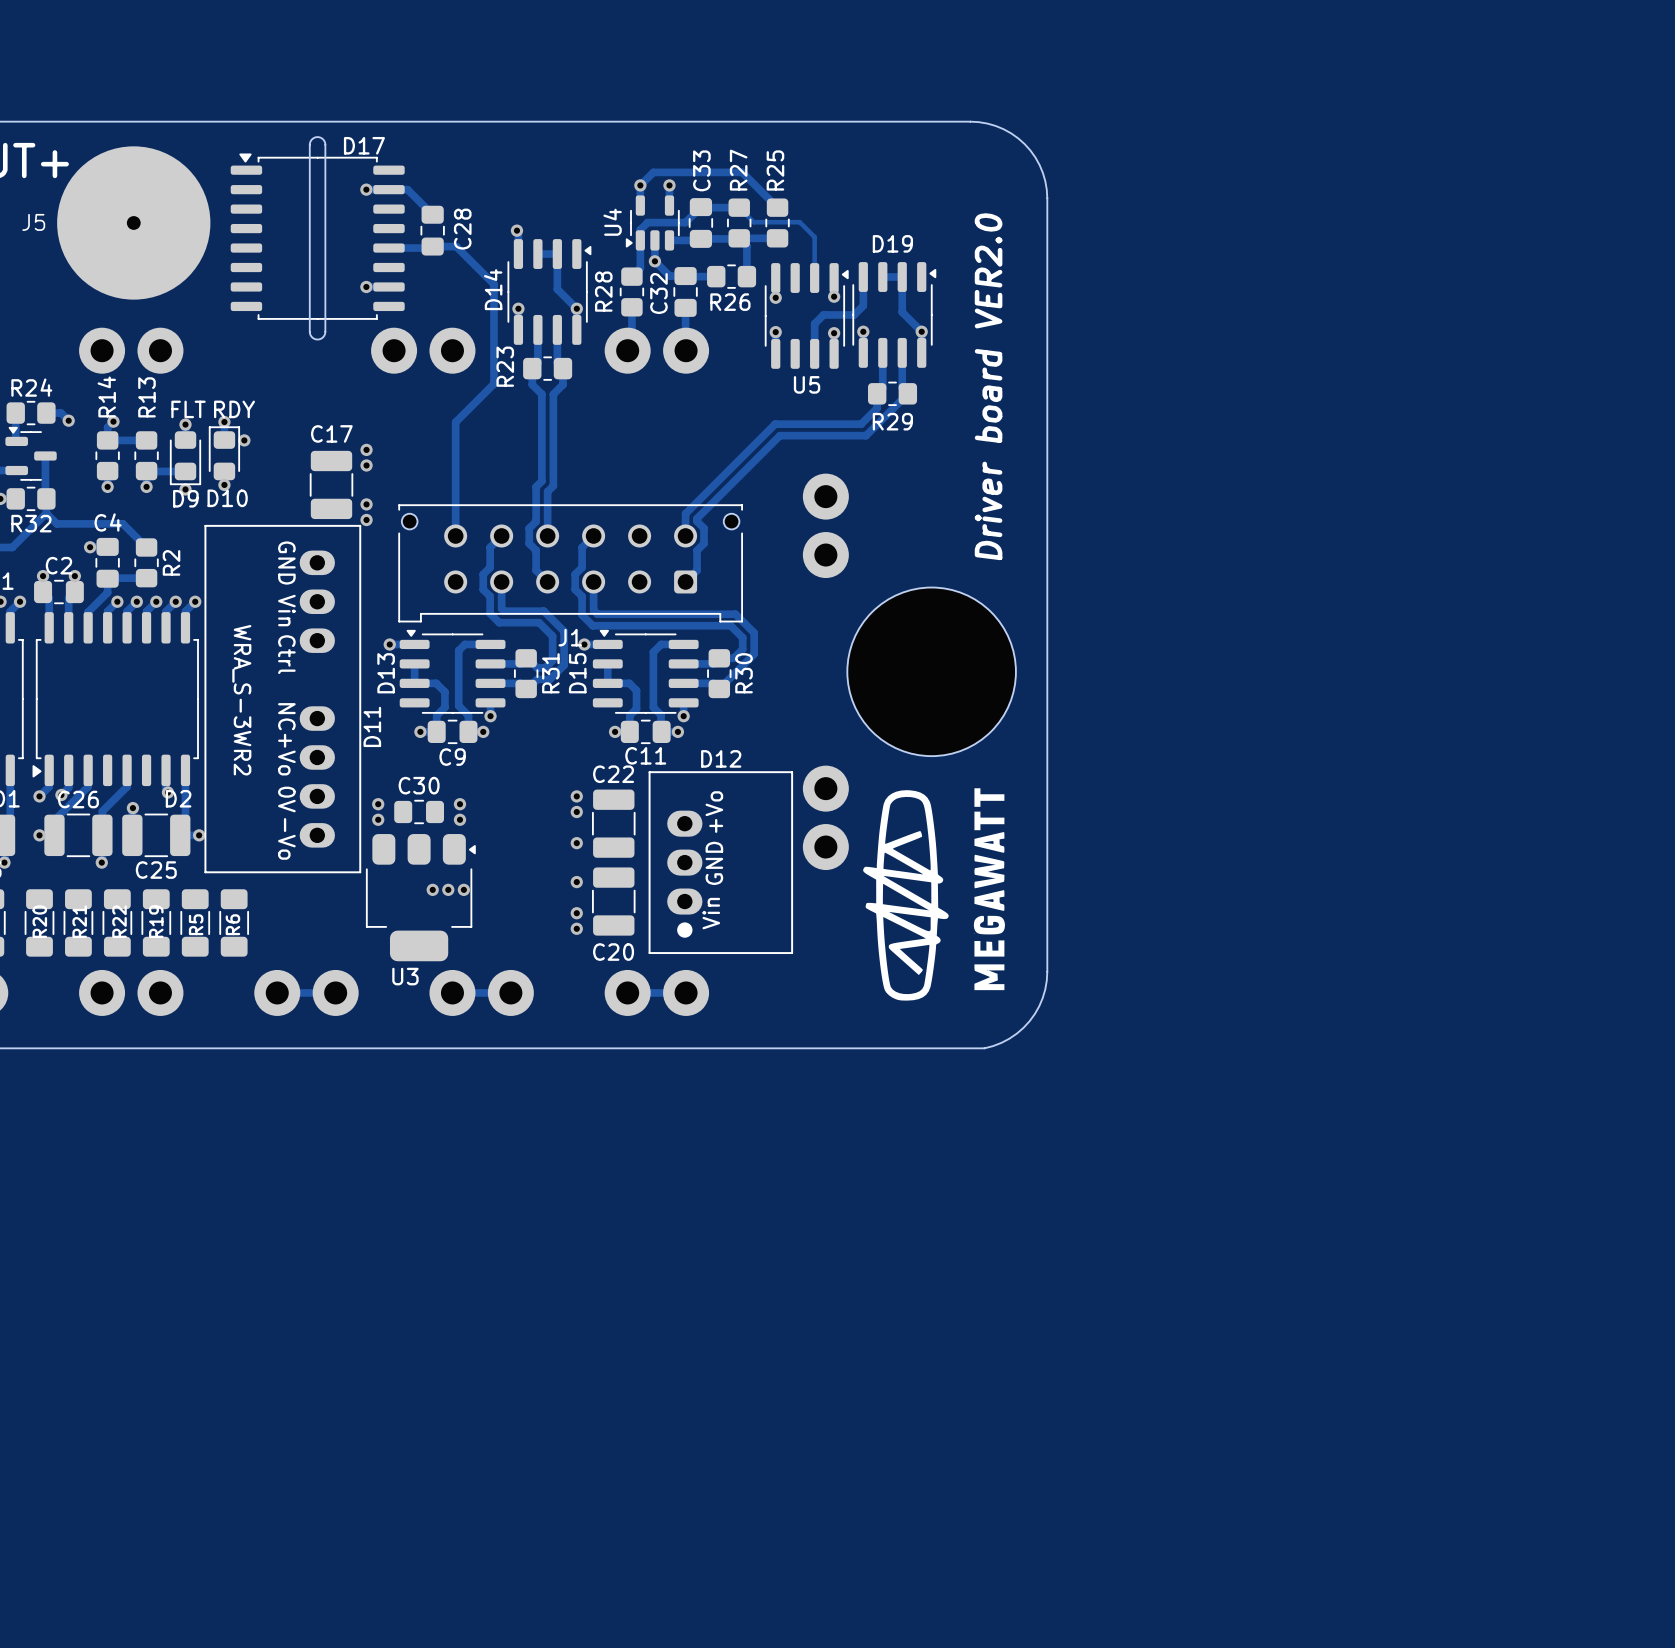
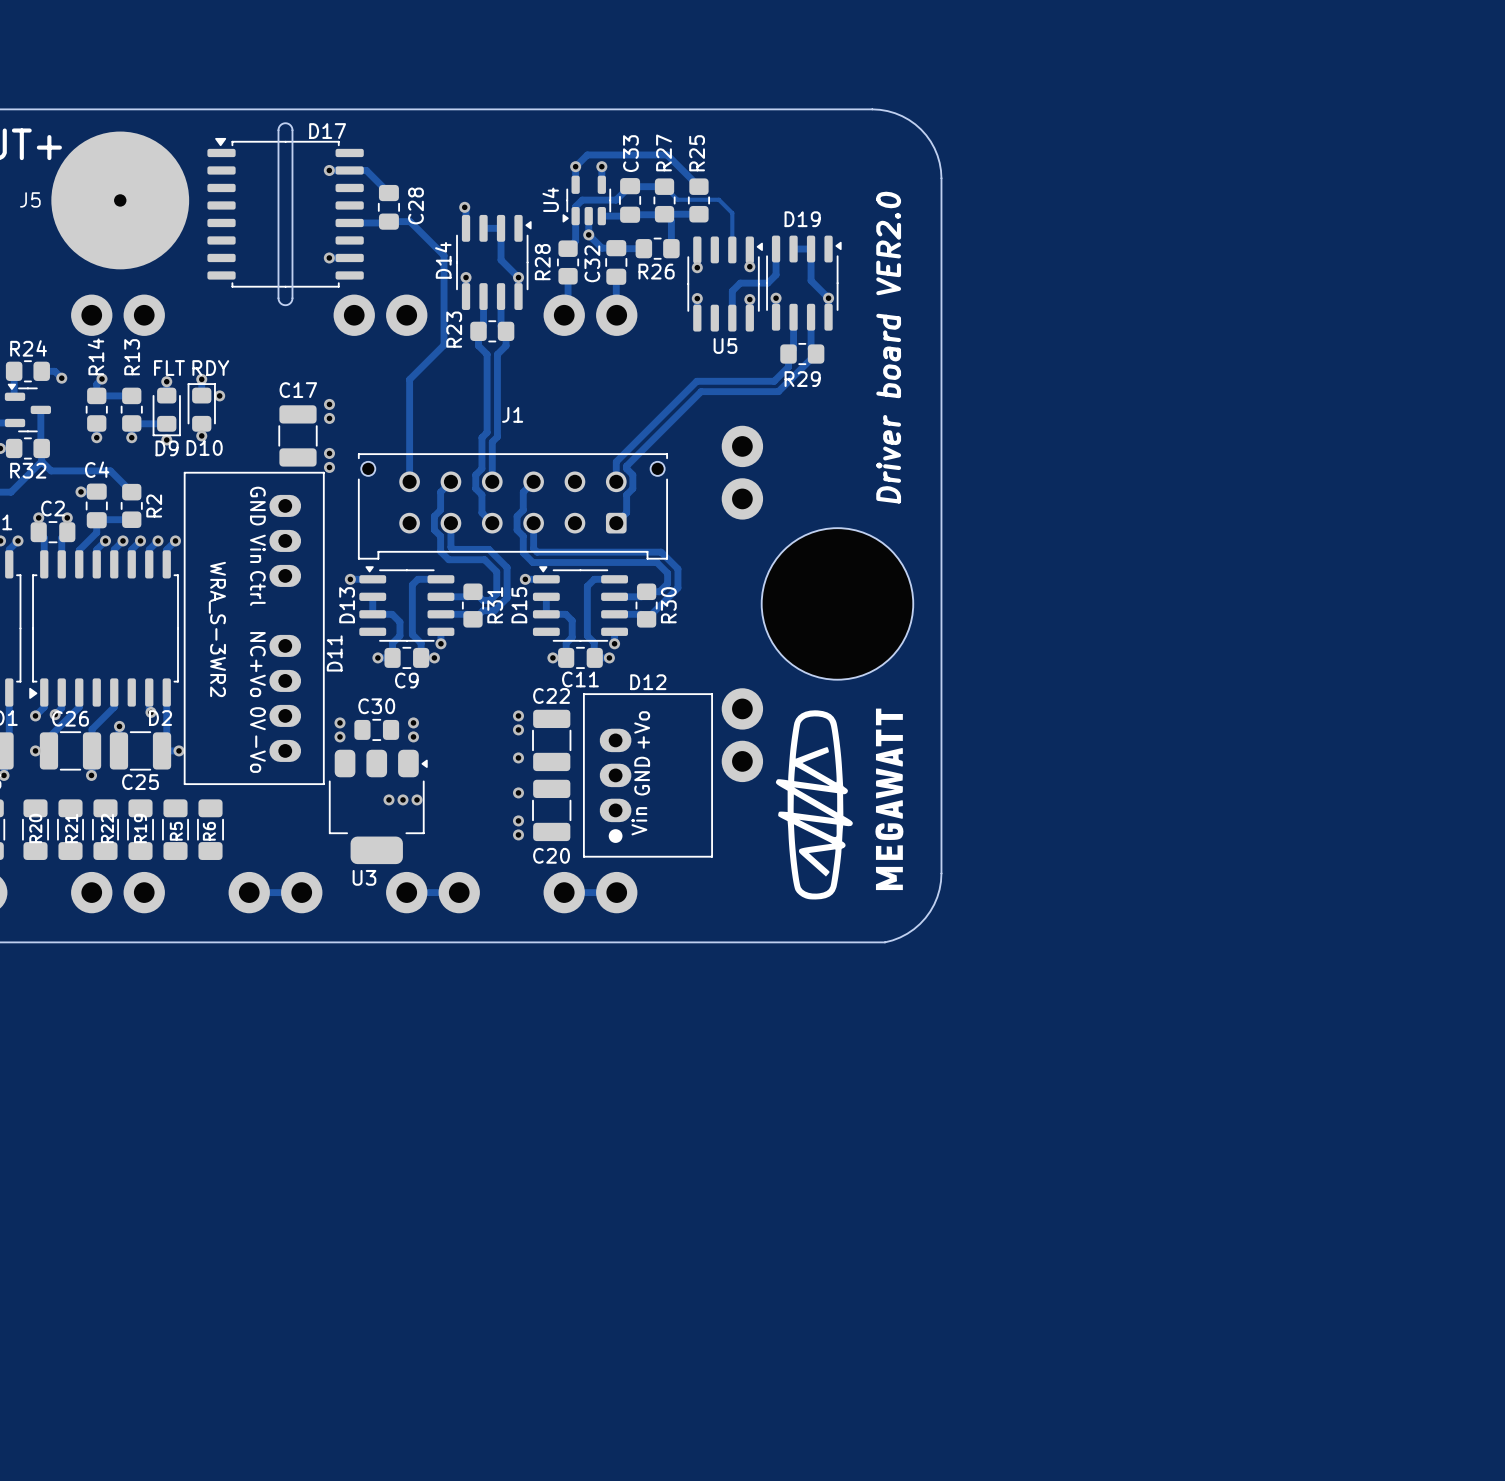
J1 name position: J1 (570, 637) -> J1 (512, 414)

